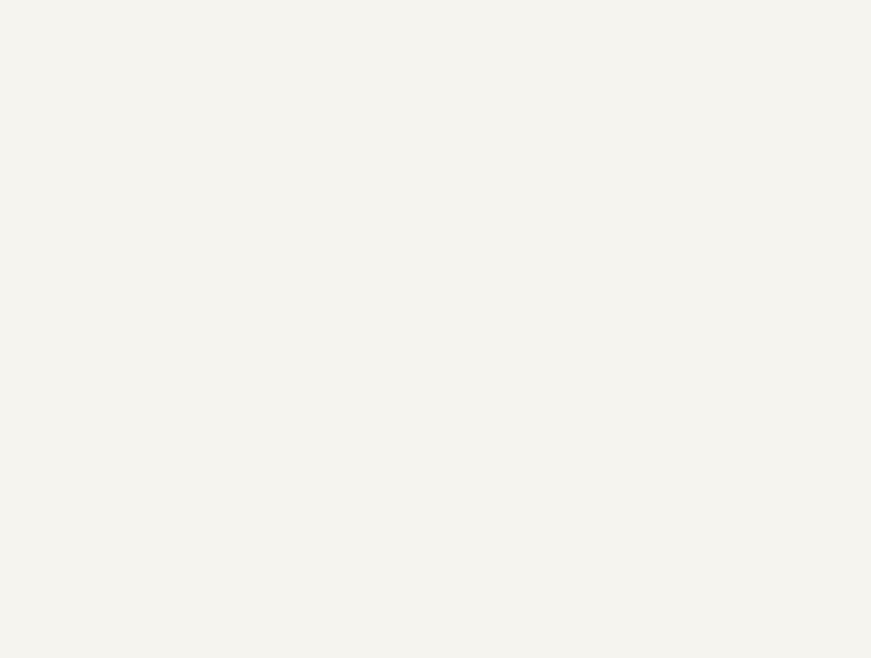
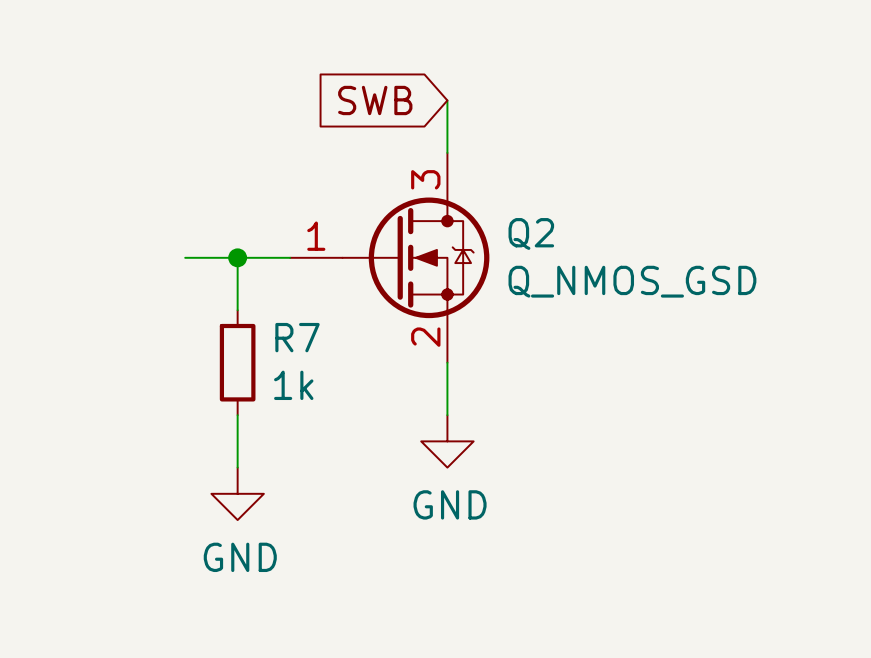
global label: none -> SWB (375, 100)
wire: none -> (447, 100) (447, 152)
wire: none -> (185, 257) (290, 257)
wire: none -> (237, 257) (237, 310)
junction: none -> (237, 257)
Q2: none -> Q_NMOS_GSD (389, 257)
R7: none -> 1k (237, 362)
wire: none -> (447, 362) (447, 415)
wire: none -> (237, 415) (237, 467)
power symbol: none -> GND (447, 441)
power symbol: none -> GND (237, 493)

